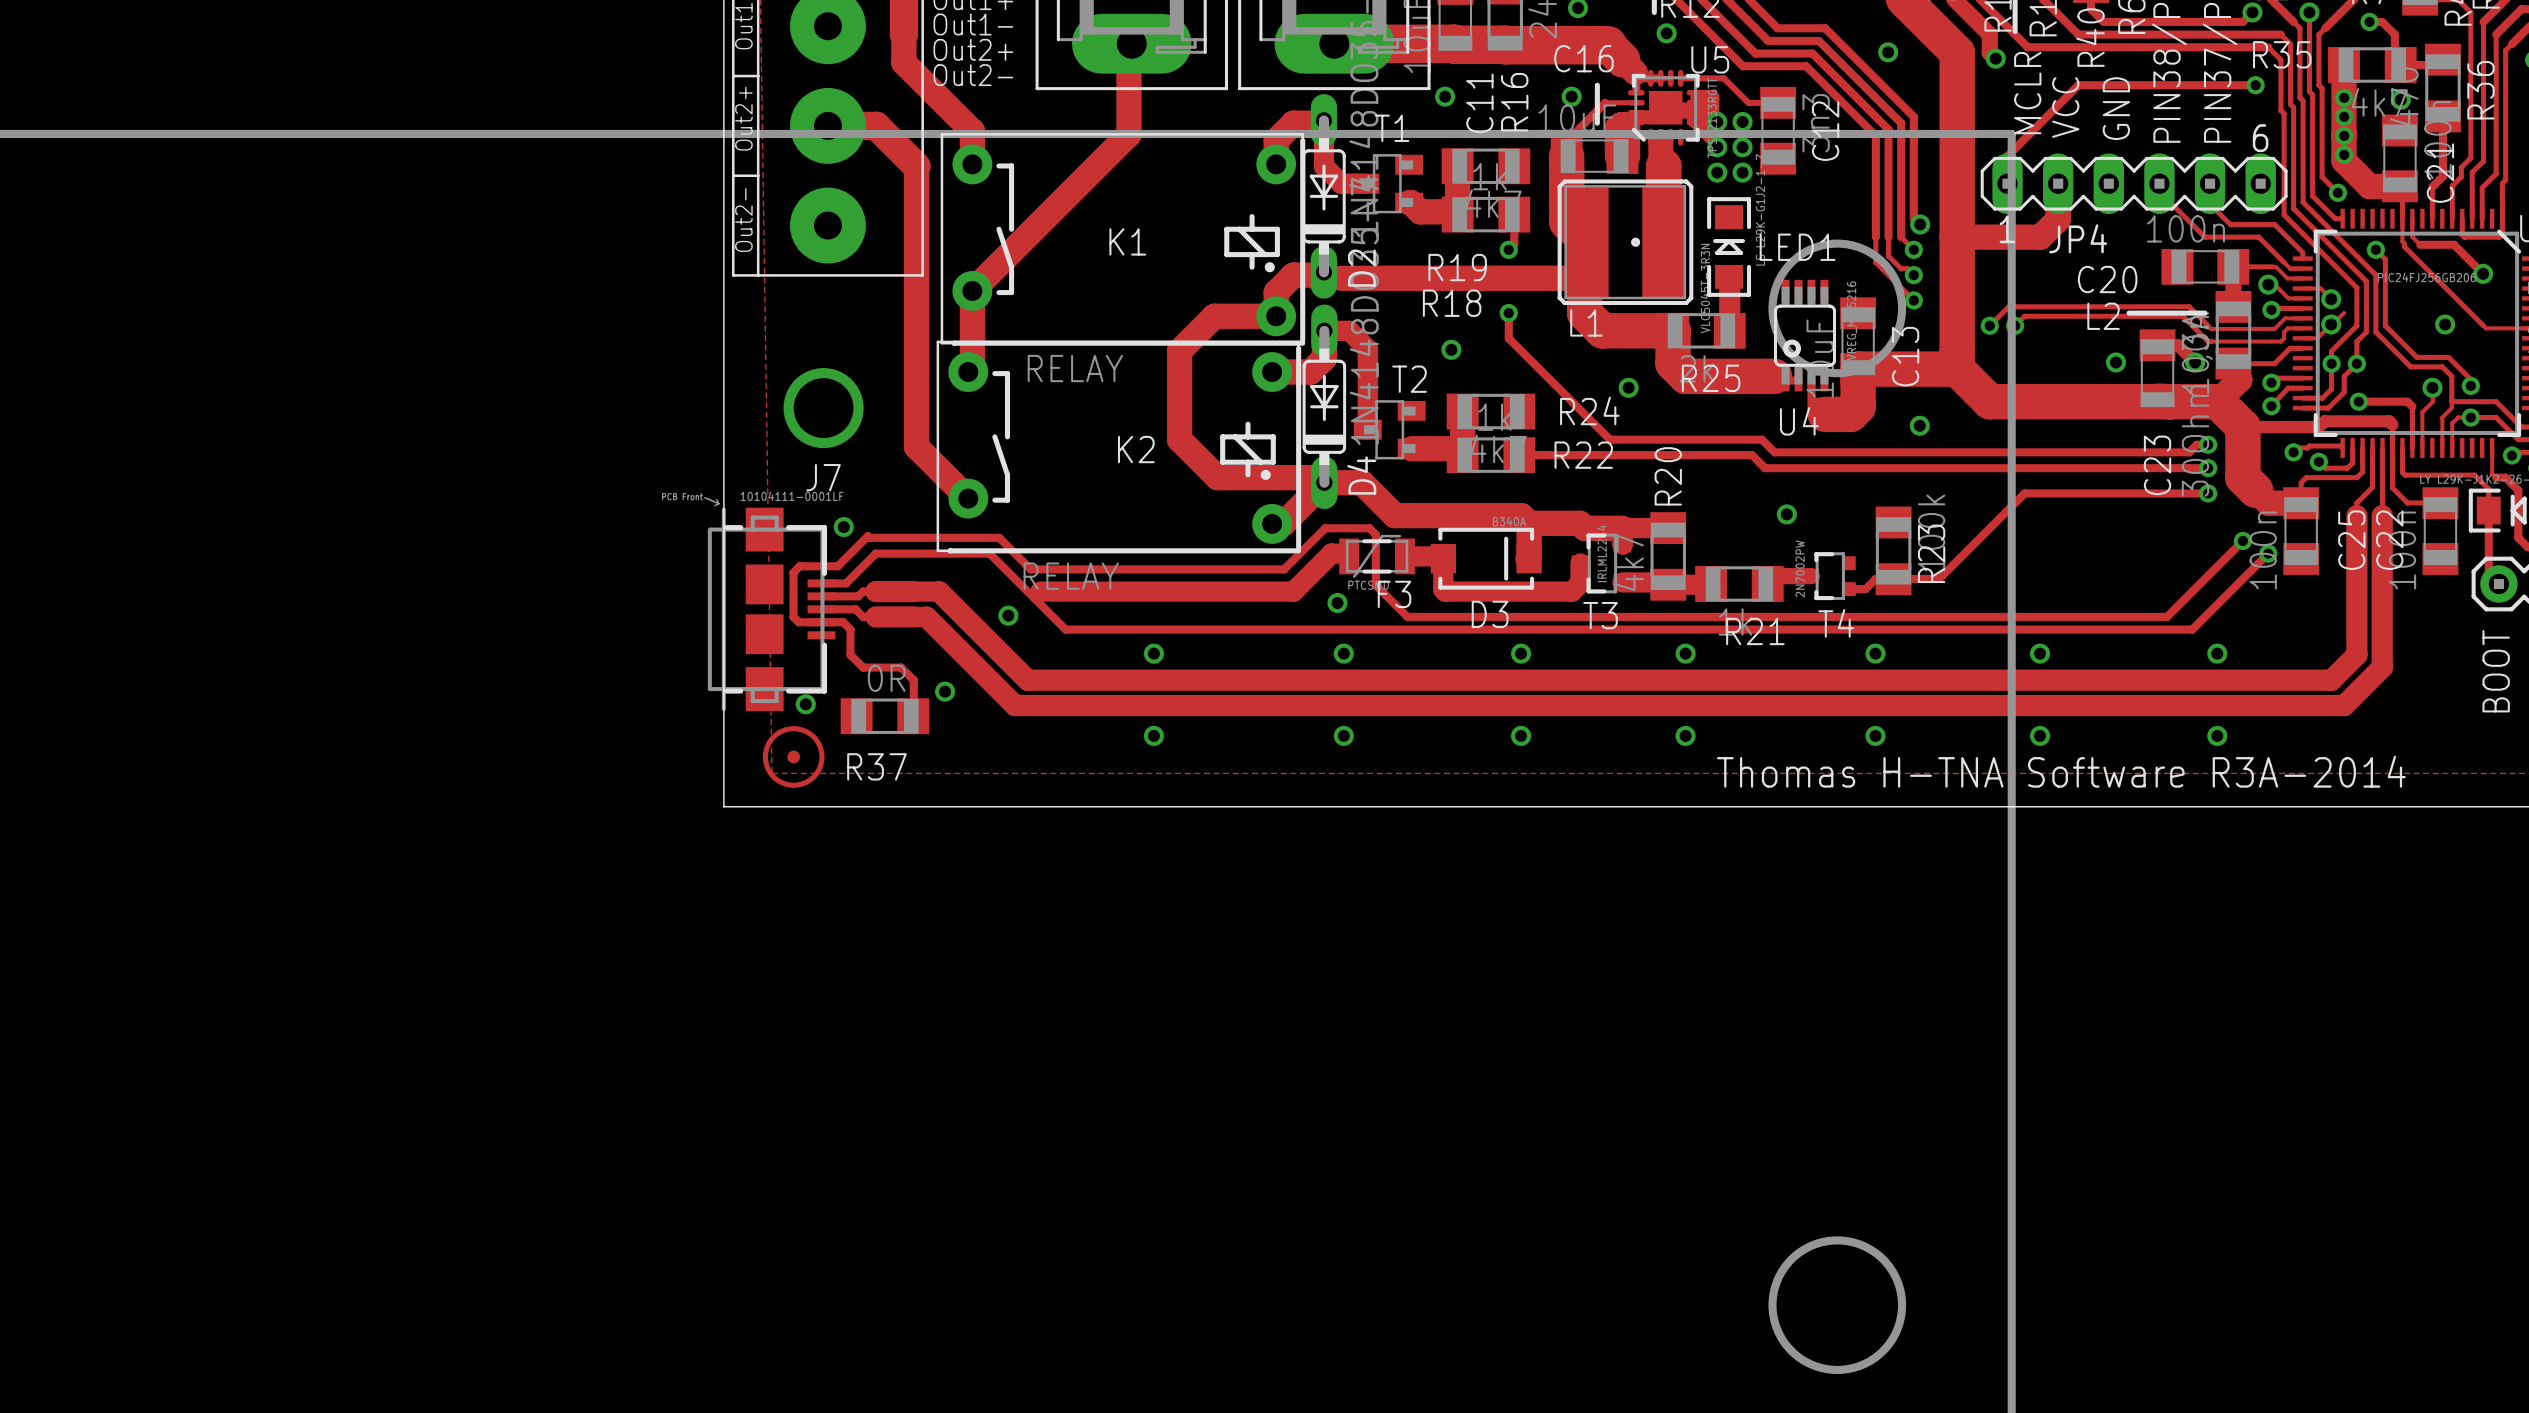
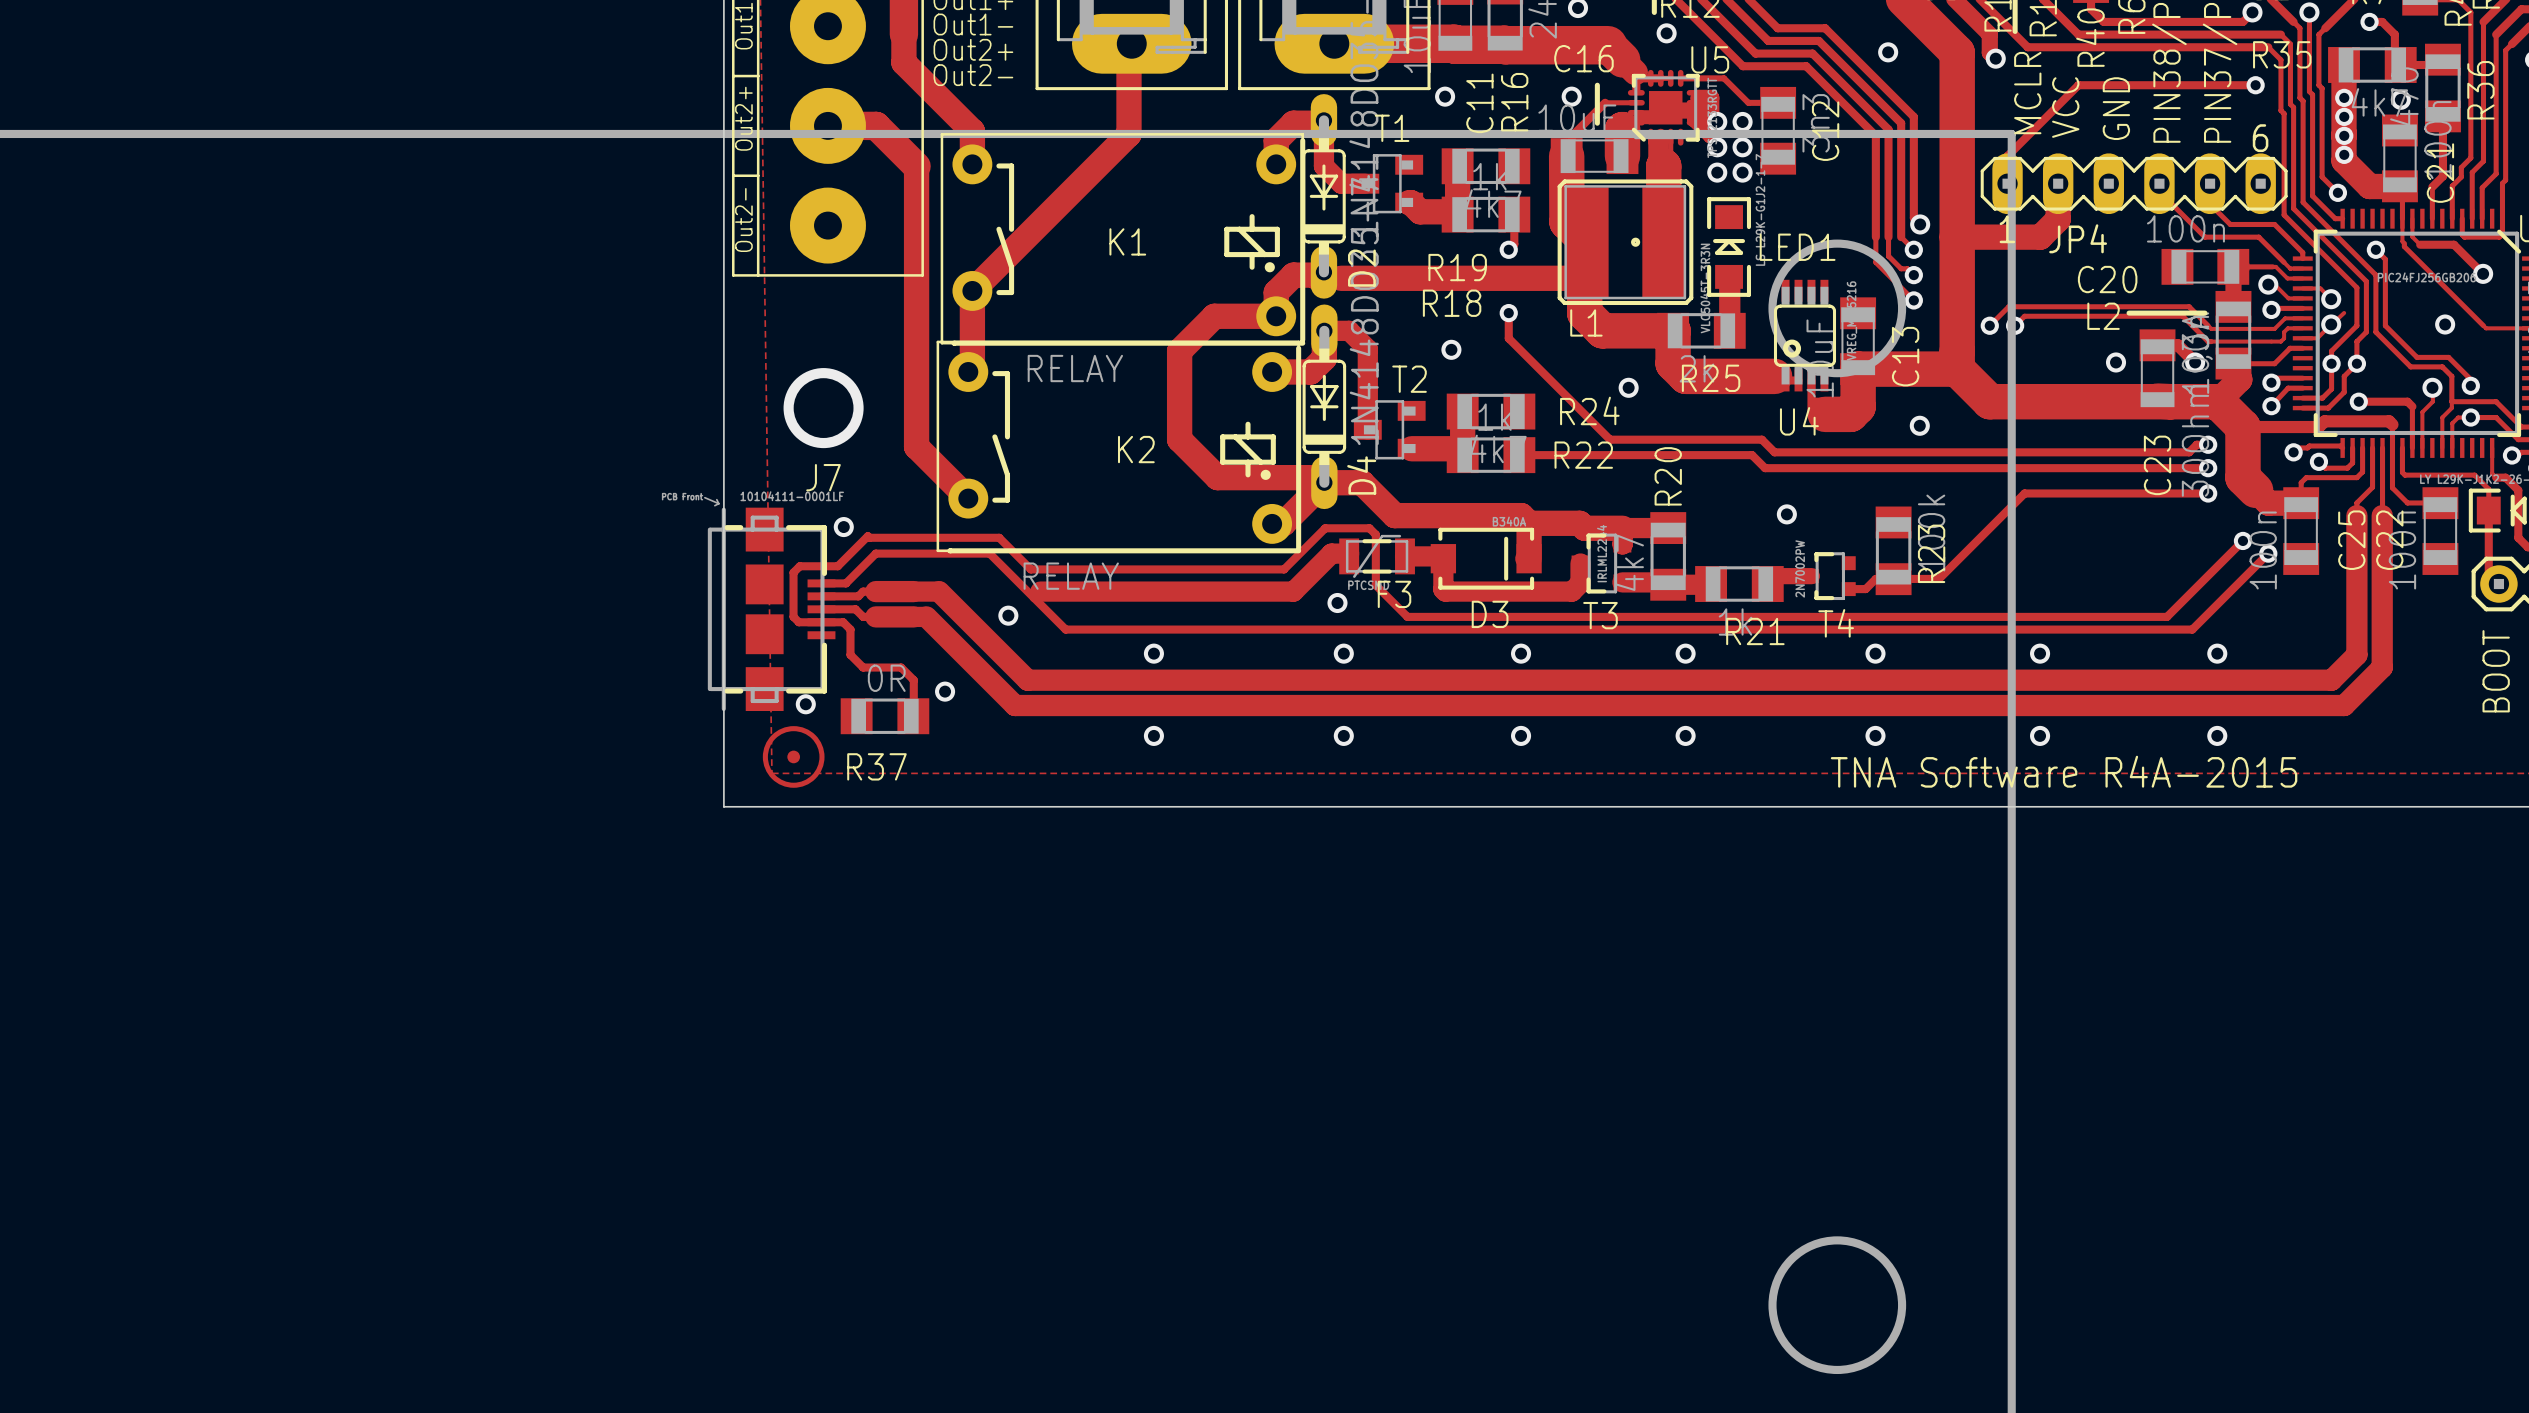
text: Thomas H-TNA Software R3A-2014 (2061, 771) -> TNA Software R4A-2015 (2064, 771)

